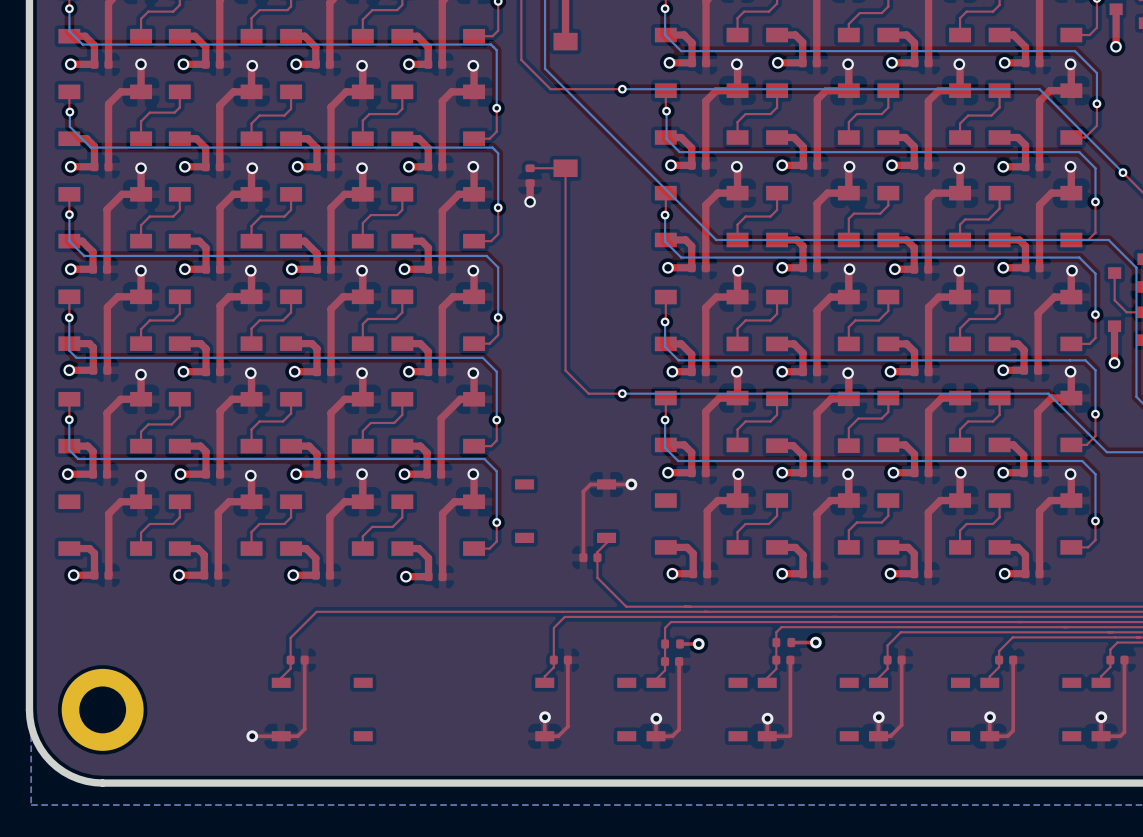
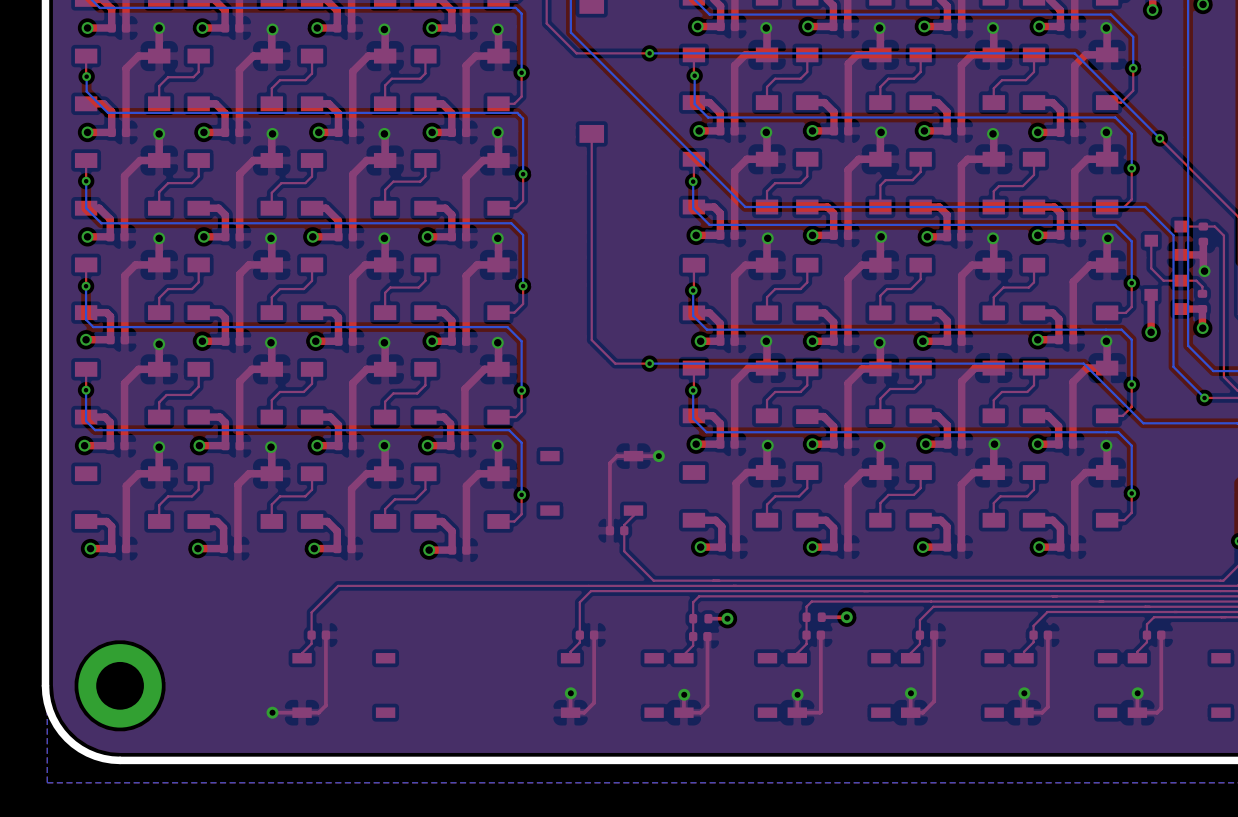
top track: (565, 168) (530, 168) -> none
part: (530, 175) -> none
top track: (530, 183) (530, 201) -> none
via: (530, 201) -> none

